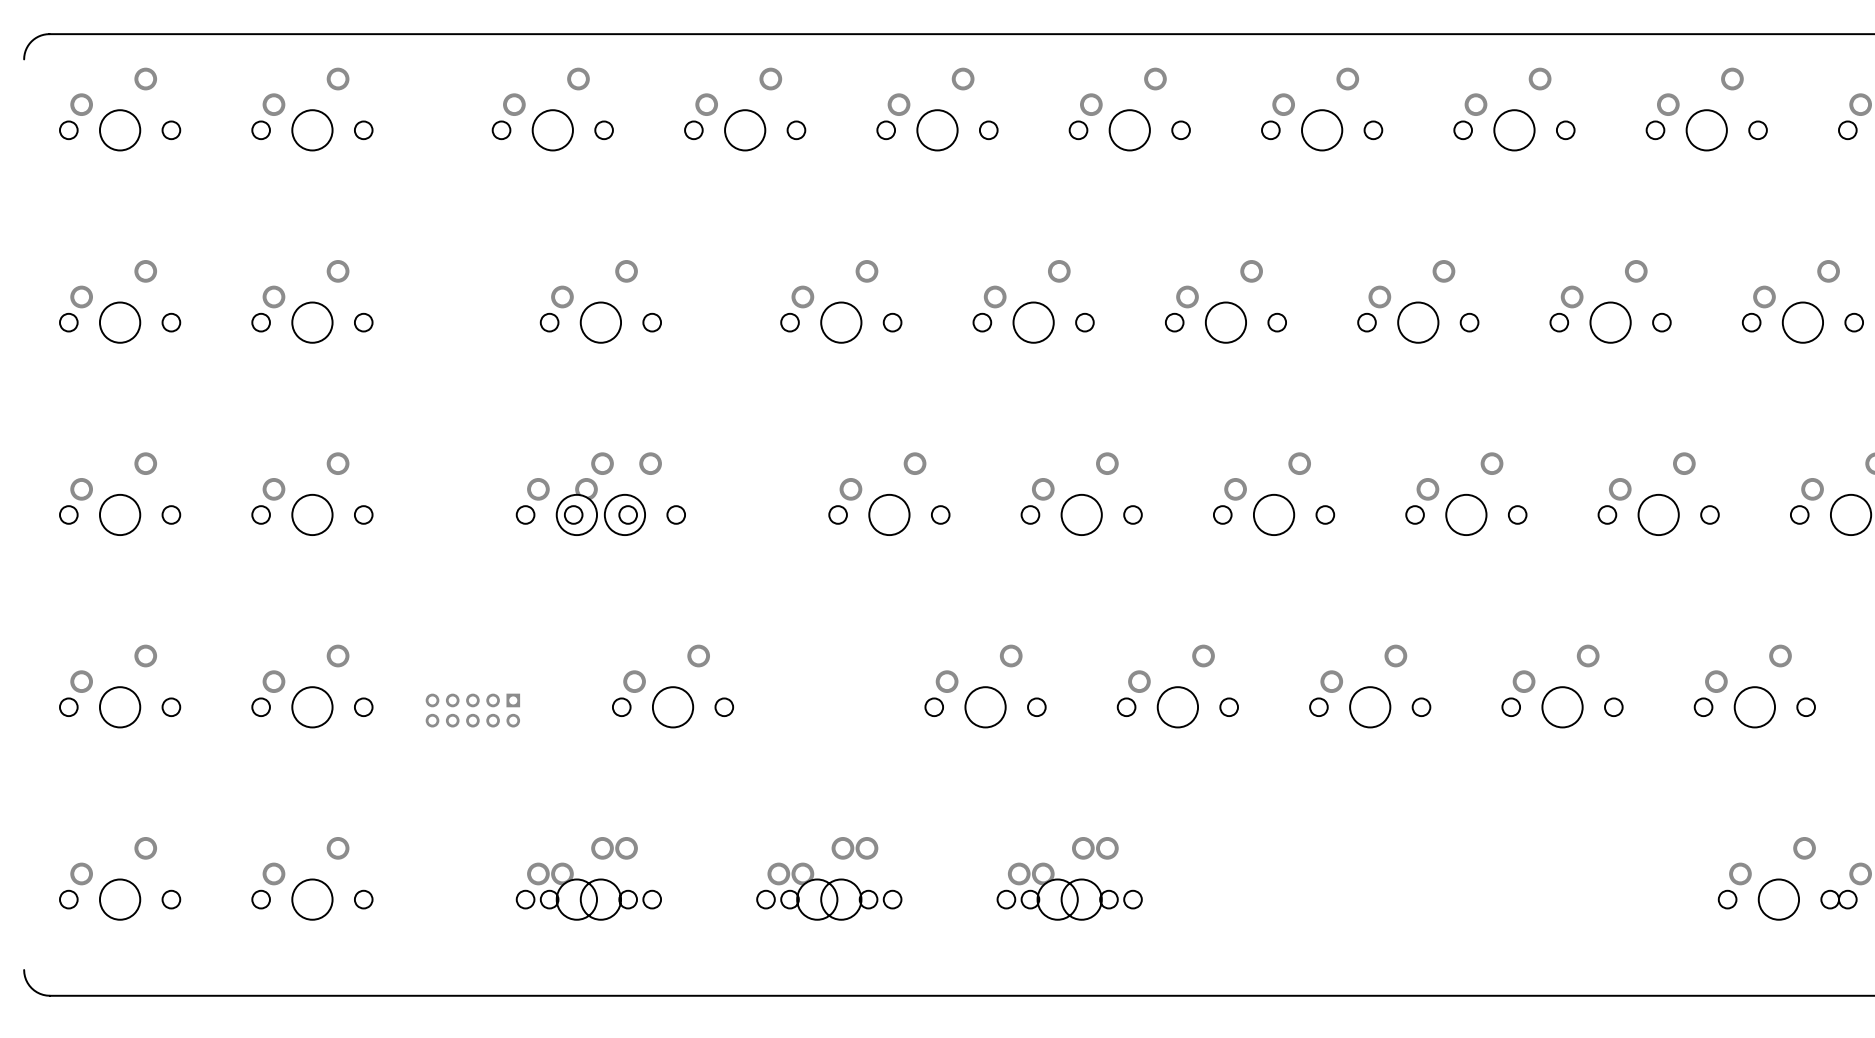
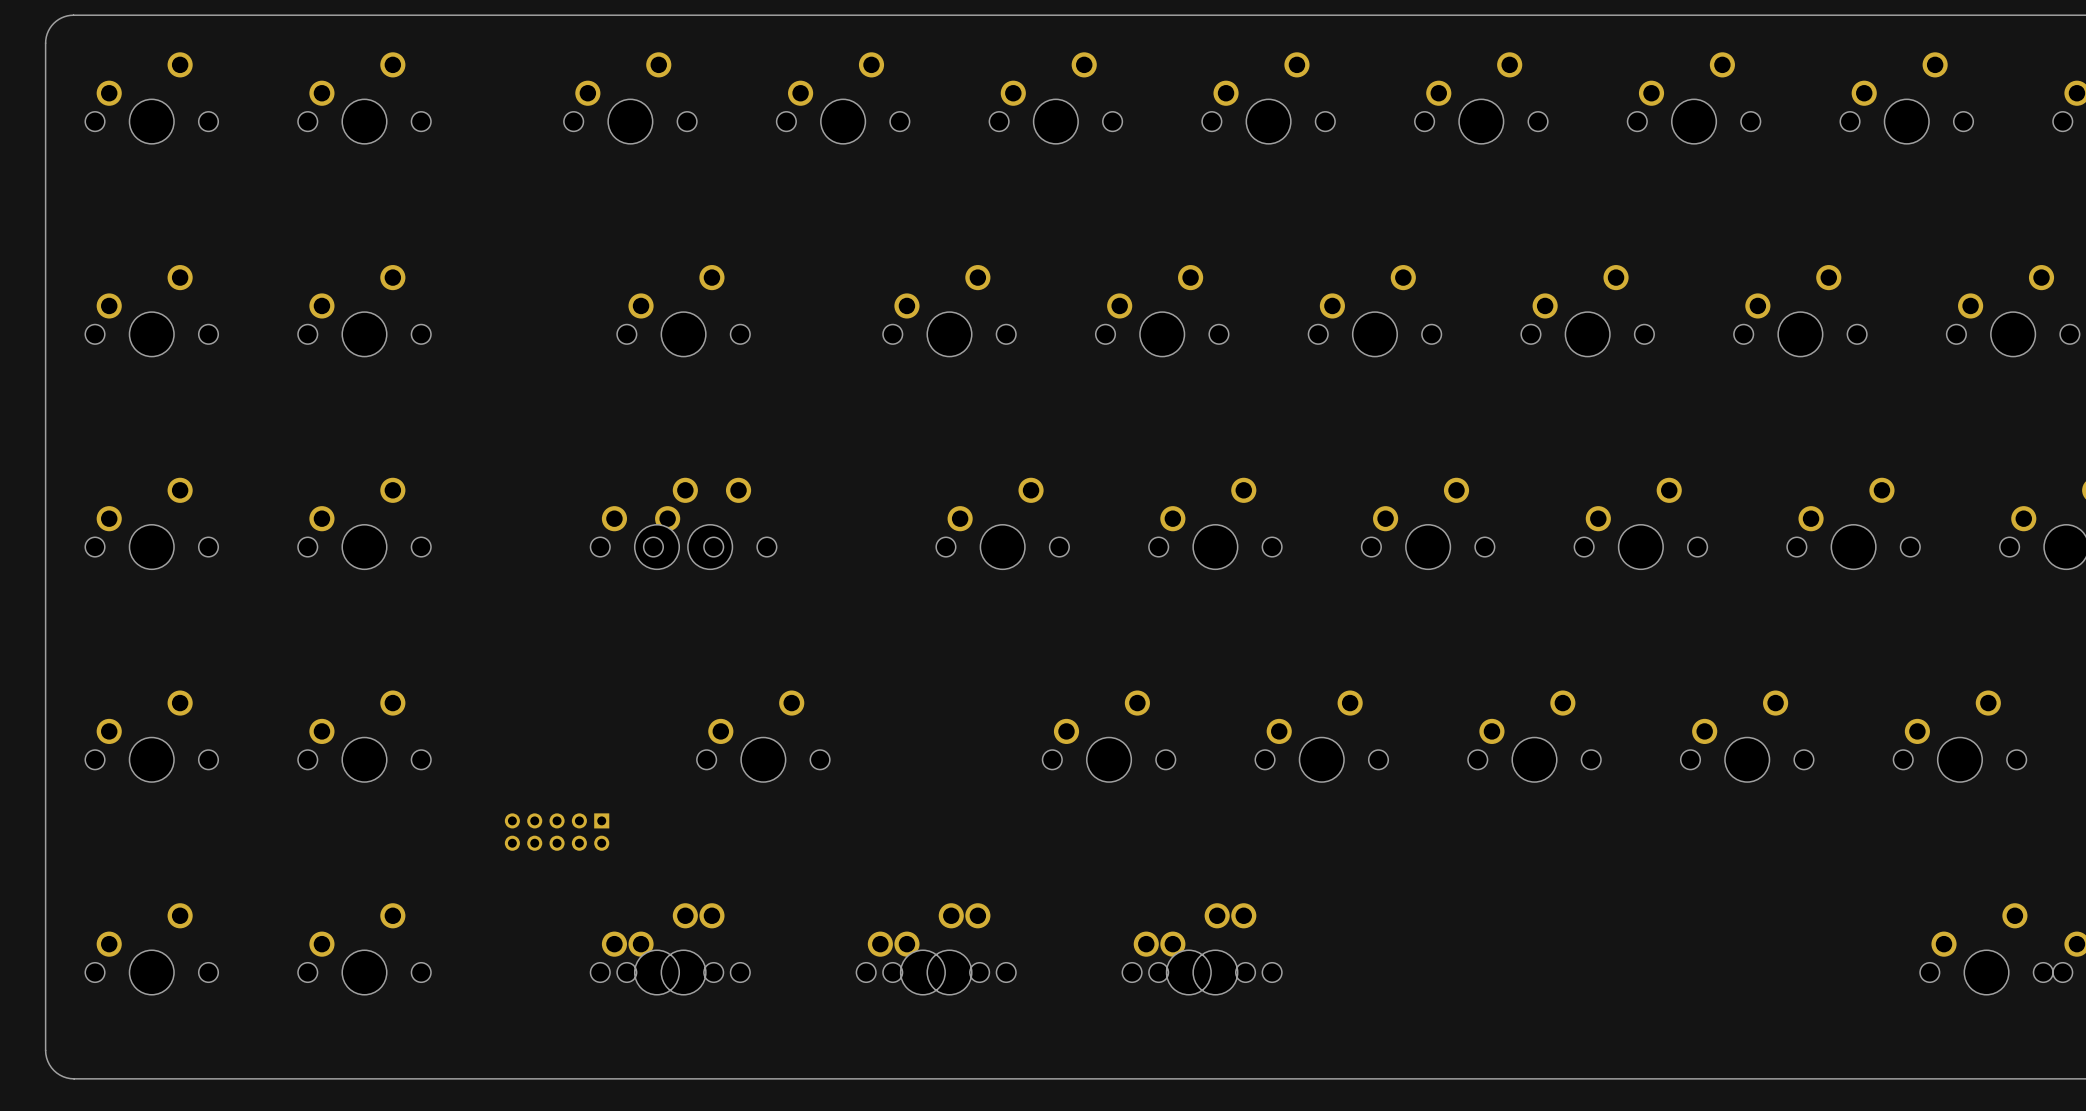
board edge: none -> (45, 43) (45, 1050)
part position: (472, 710) -> (557, 832)

